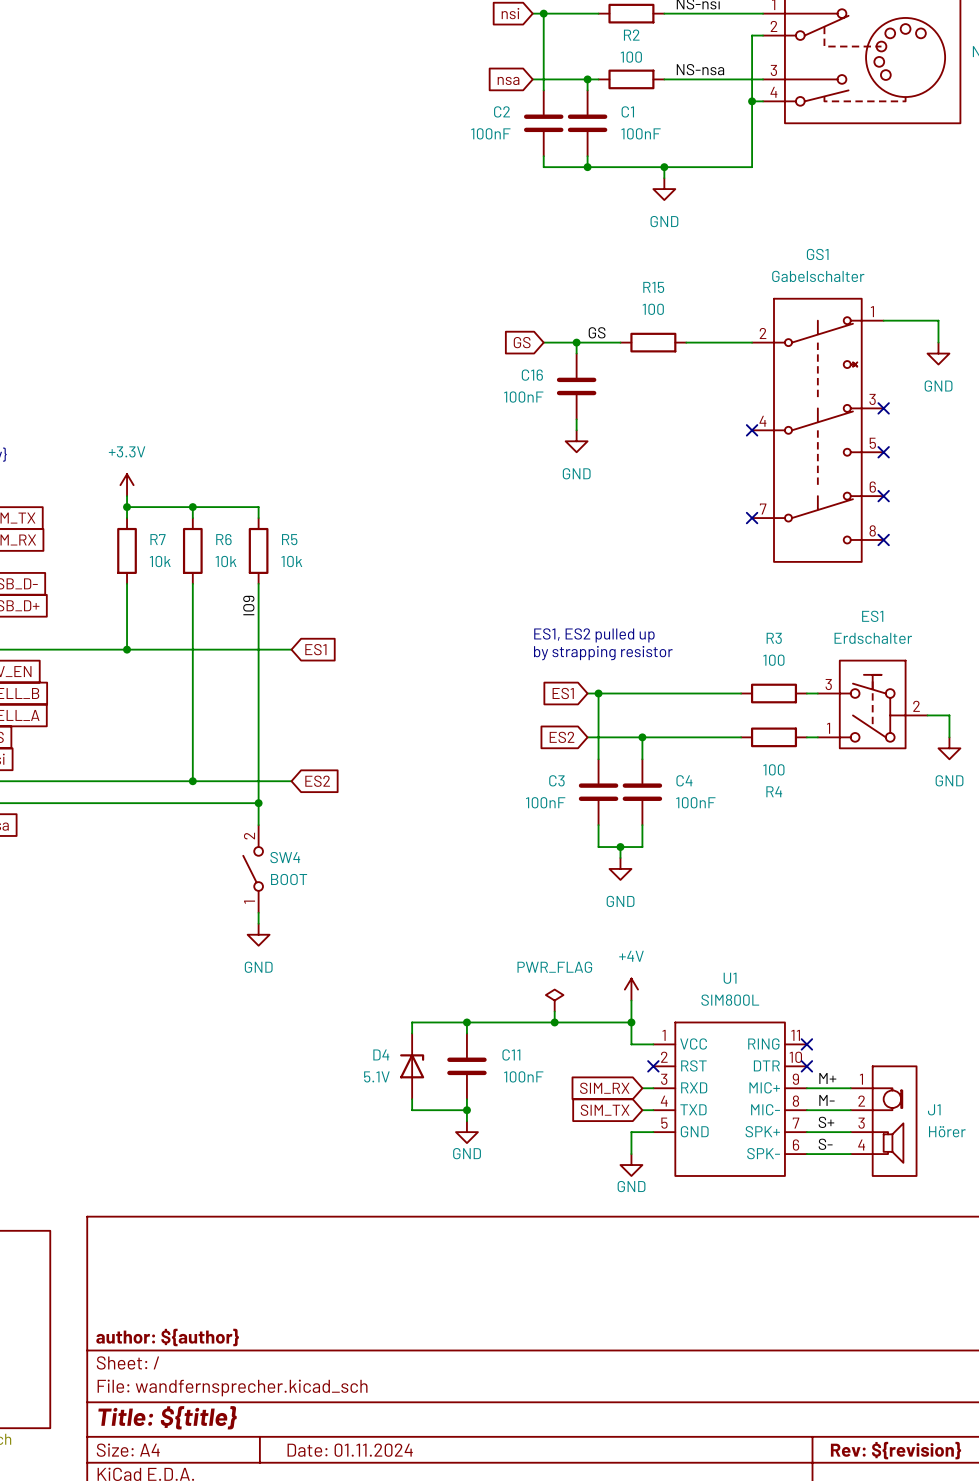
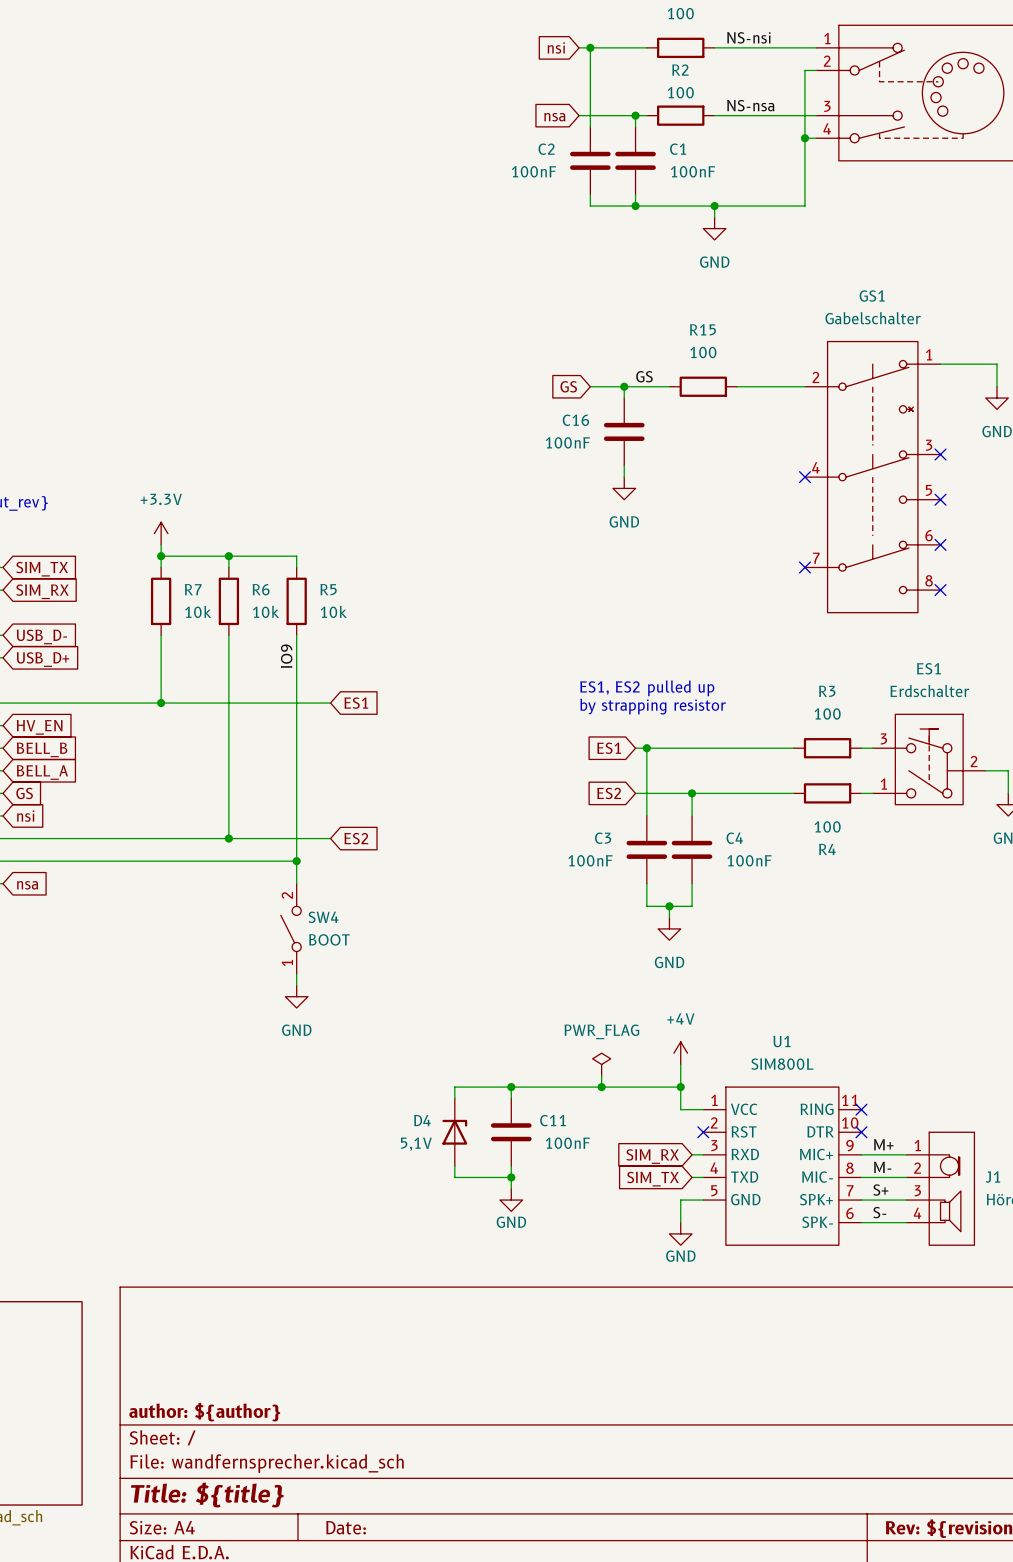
D4 value: 5.1V (376, 1076) -> 5,1V (416, 1144)
title block: Date: 01.11.2024 (350, 1450) -> Date: (346, 1527)

